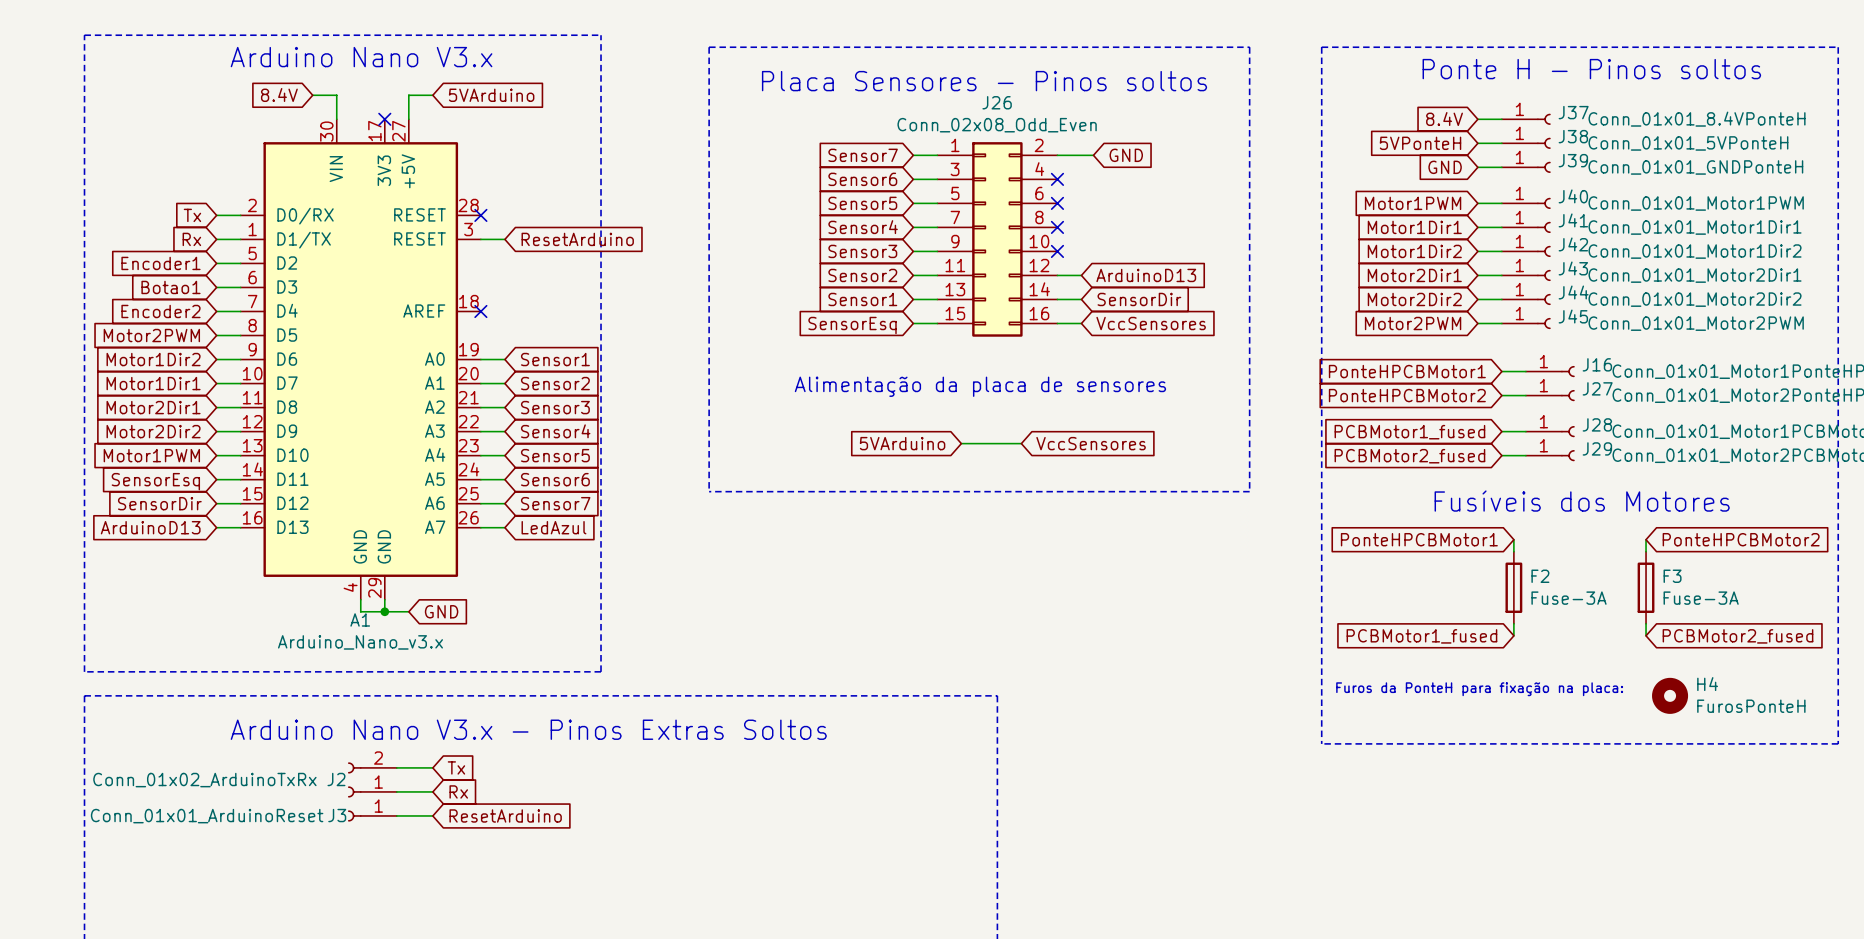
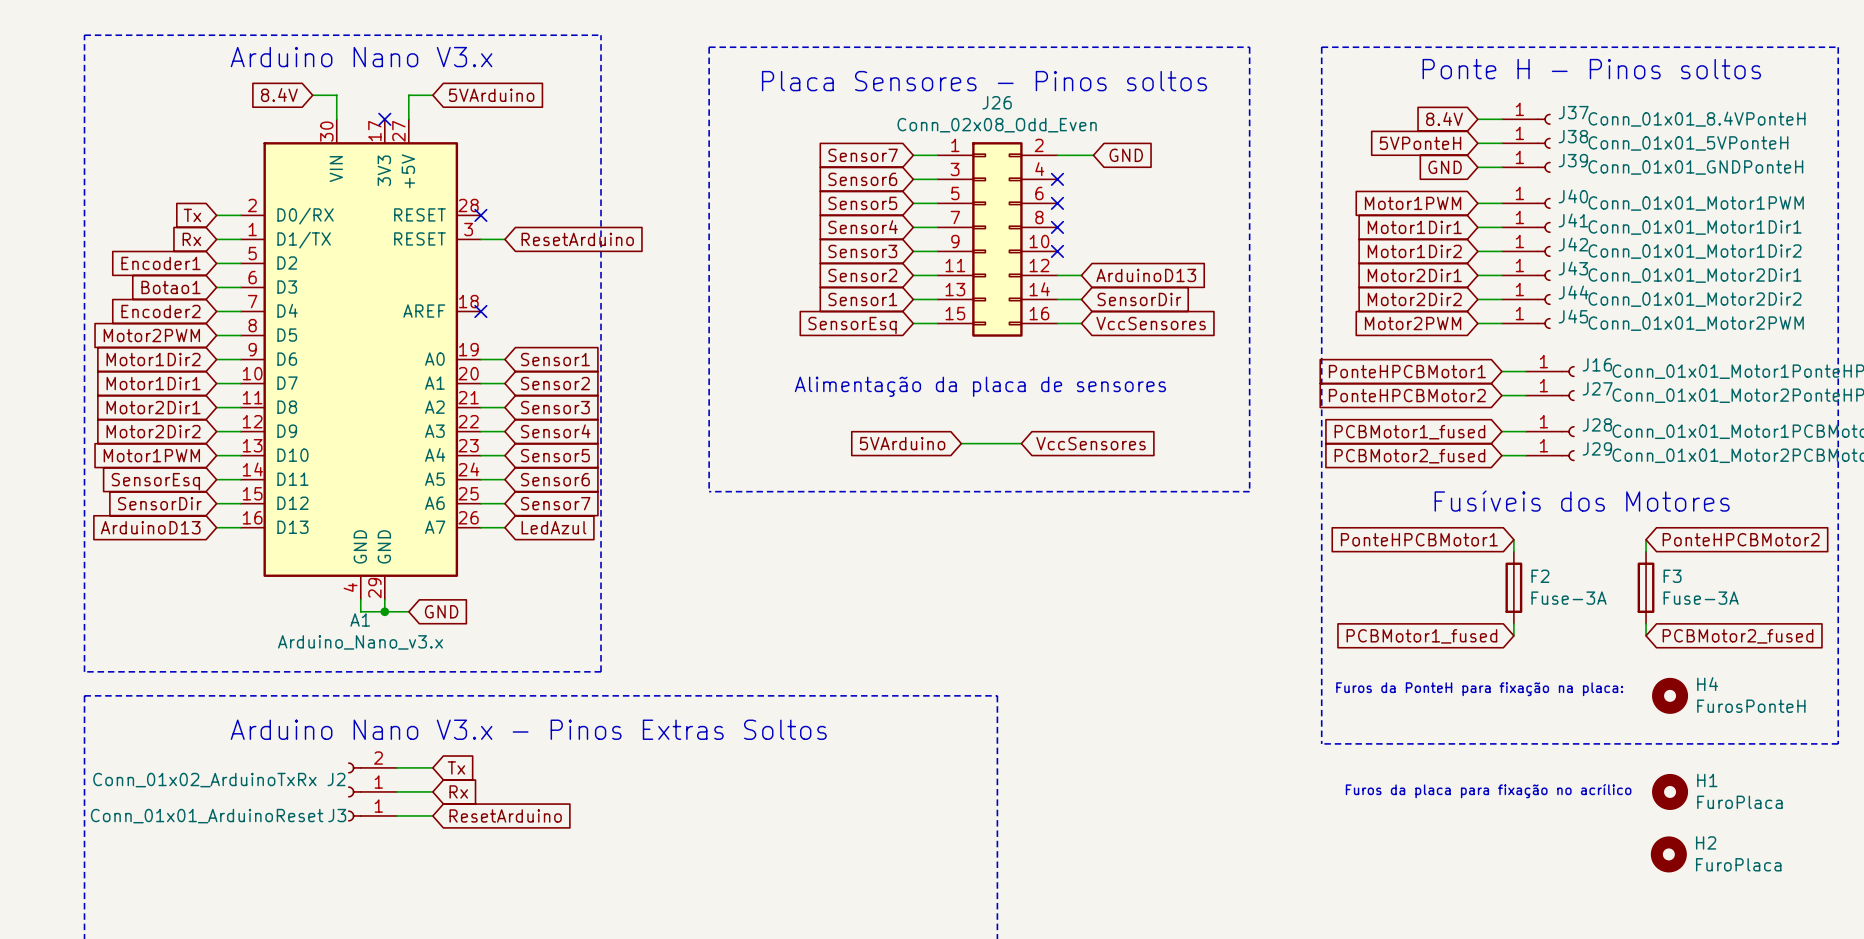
text: none -> Furos da placa para fixação no acrílico (1488, 791)
H1: none -> FuroPlaca (1670, 791)
H2: none -> FuroPlaca (1668, 854)

